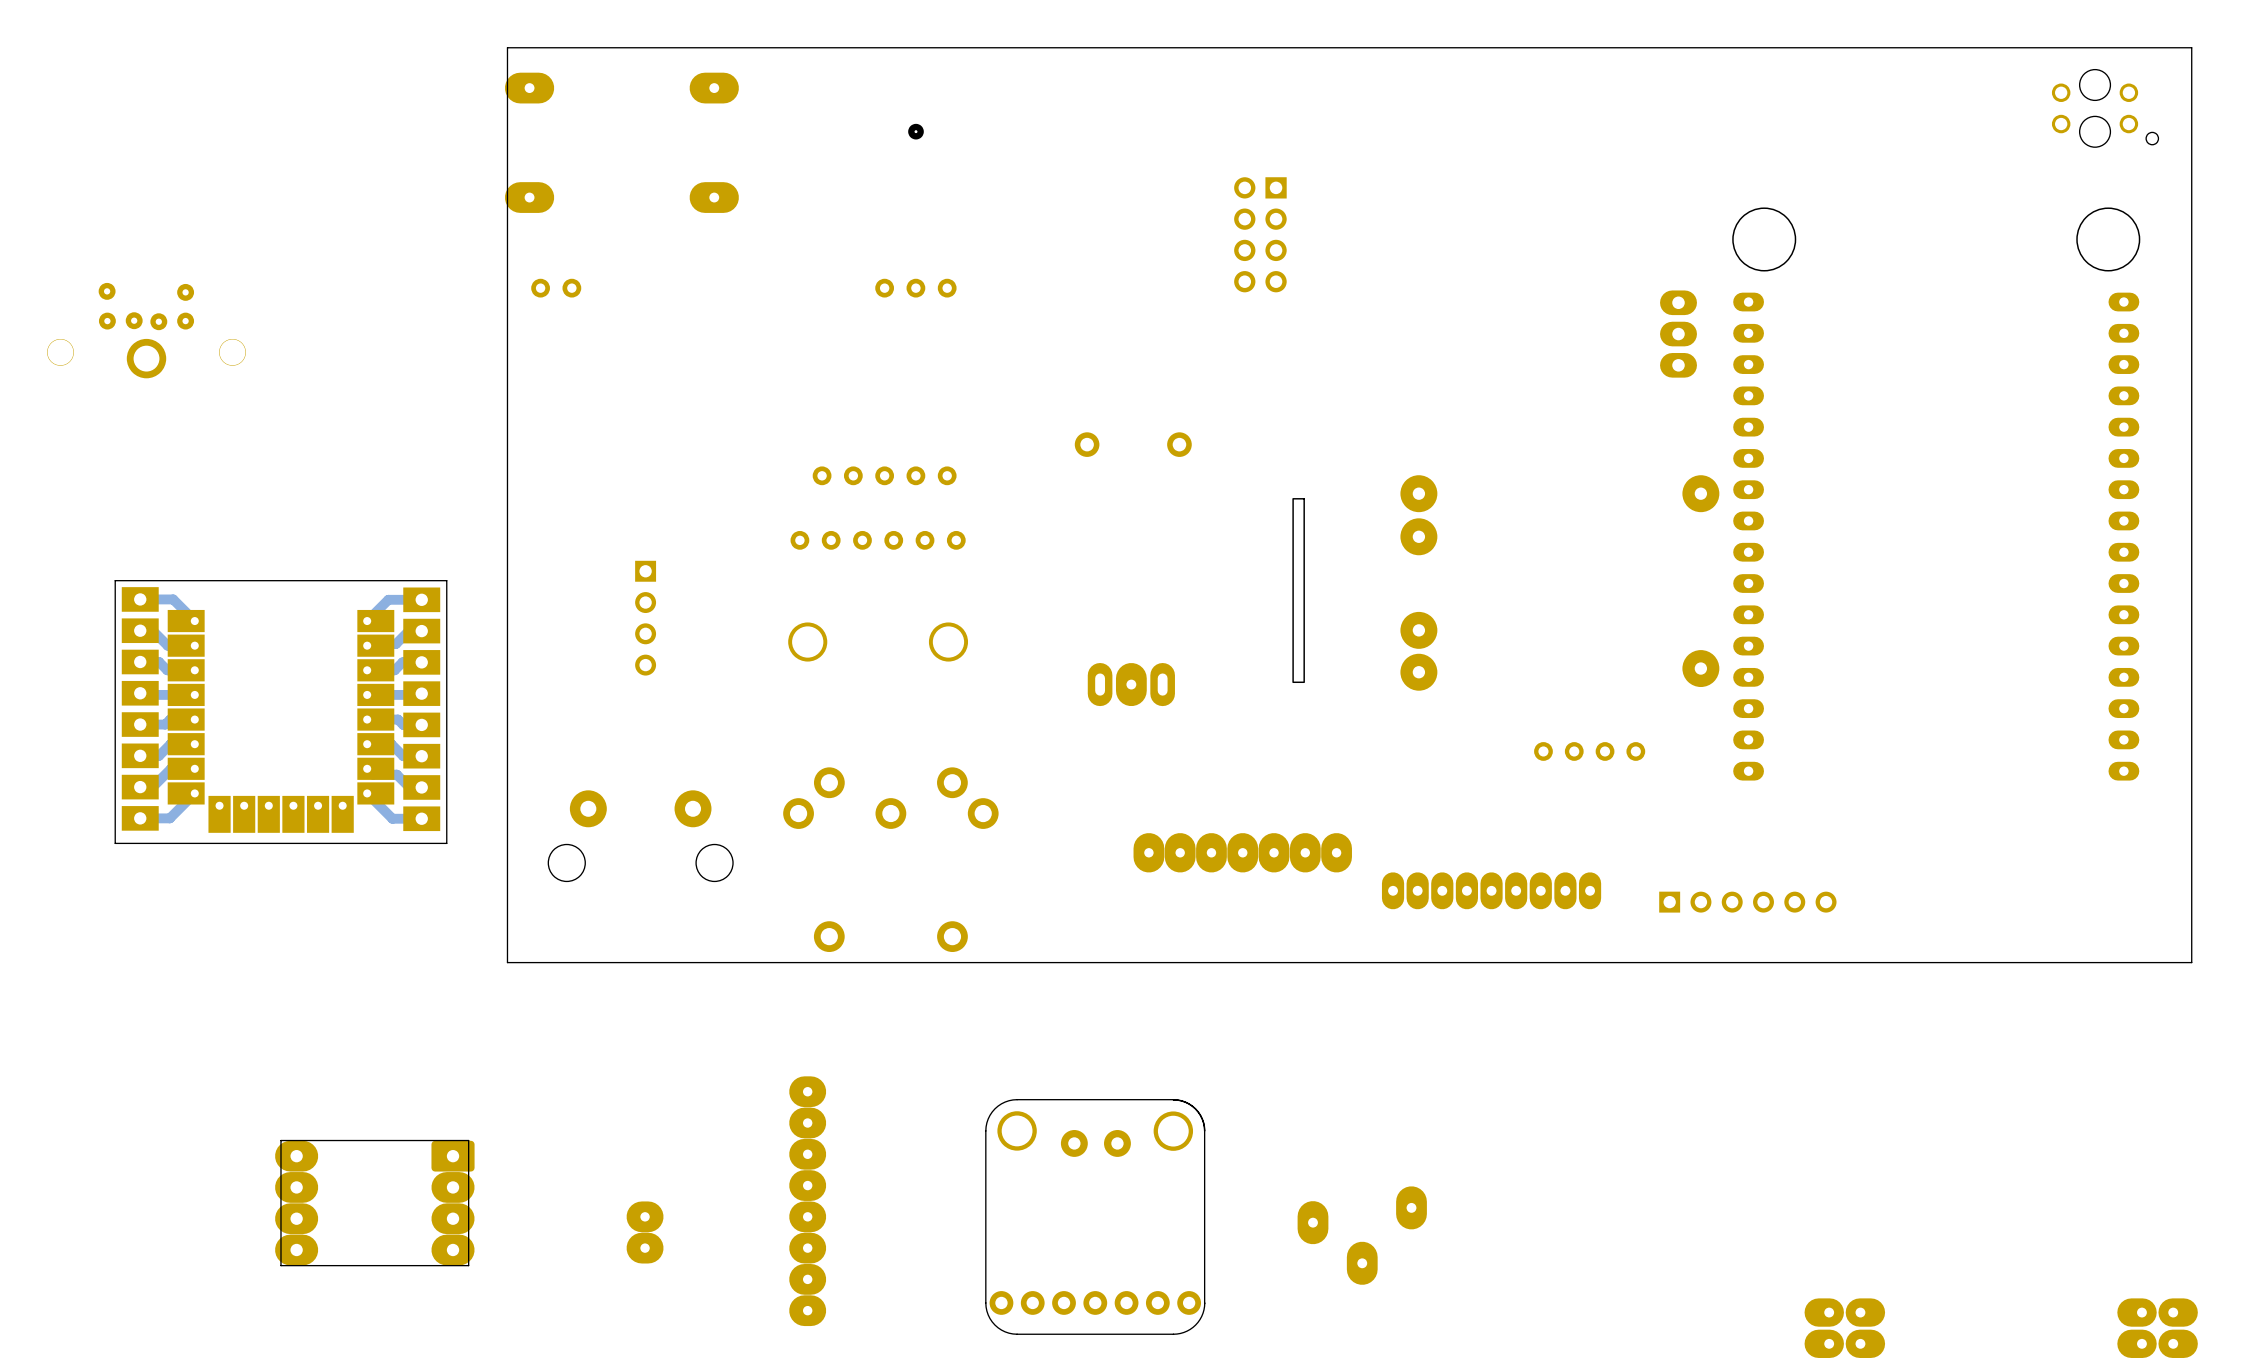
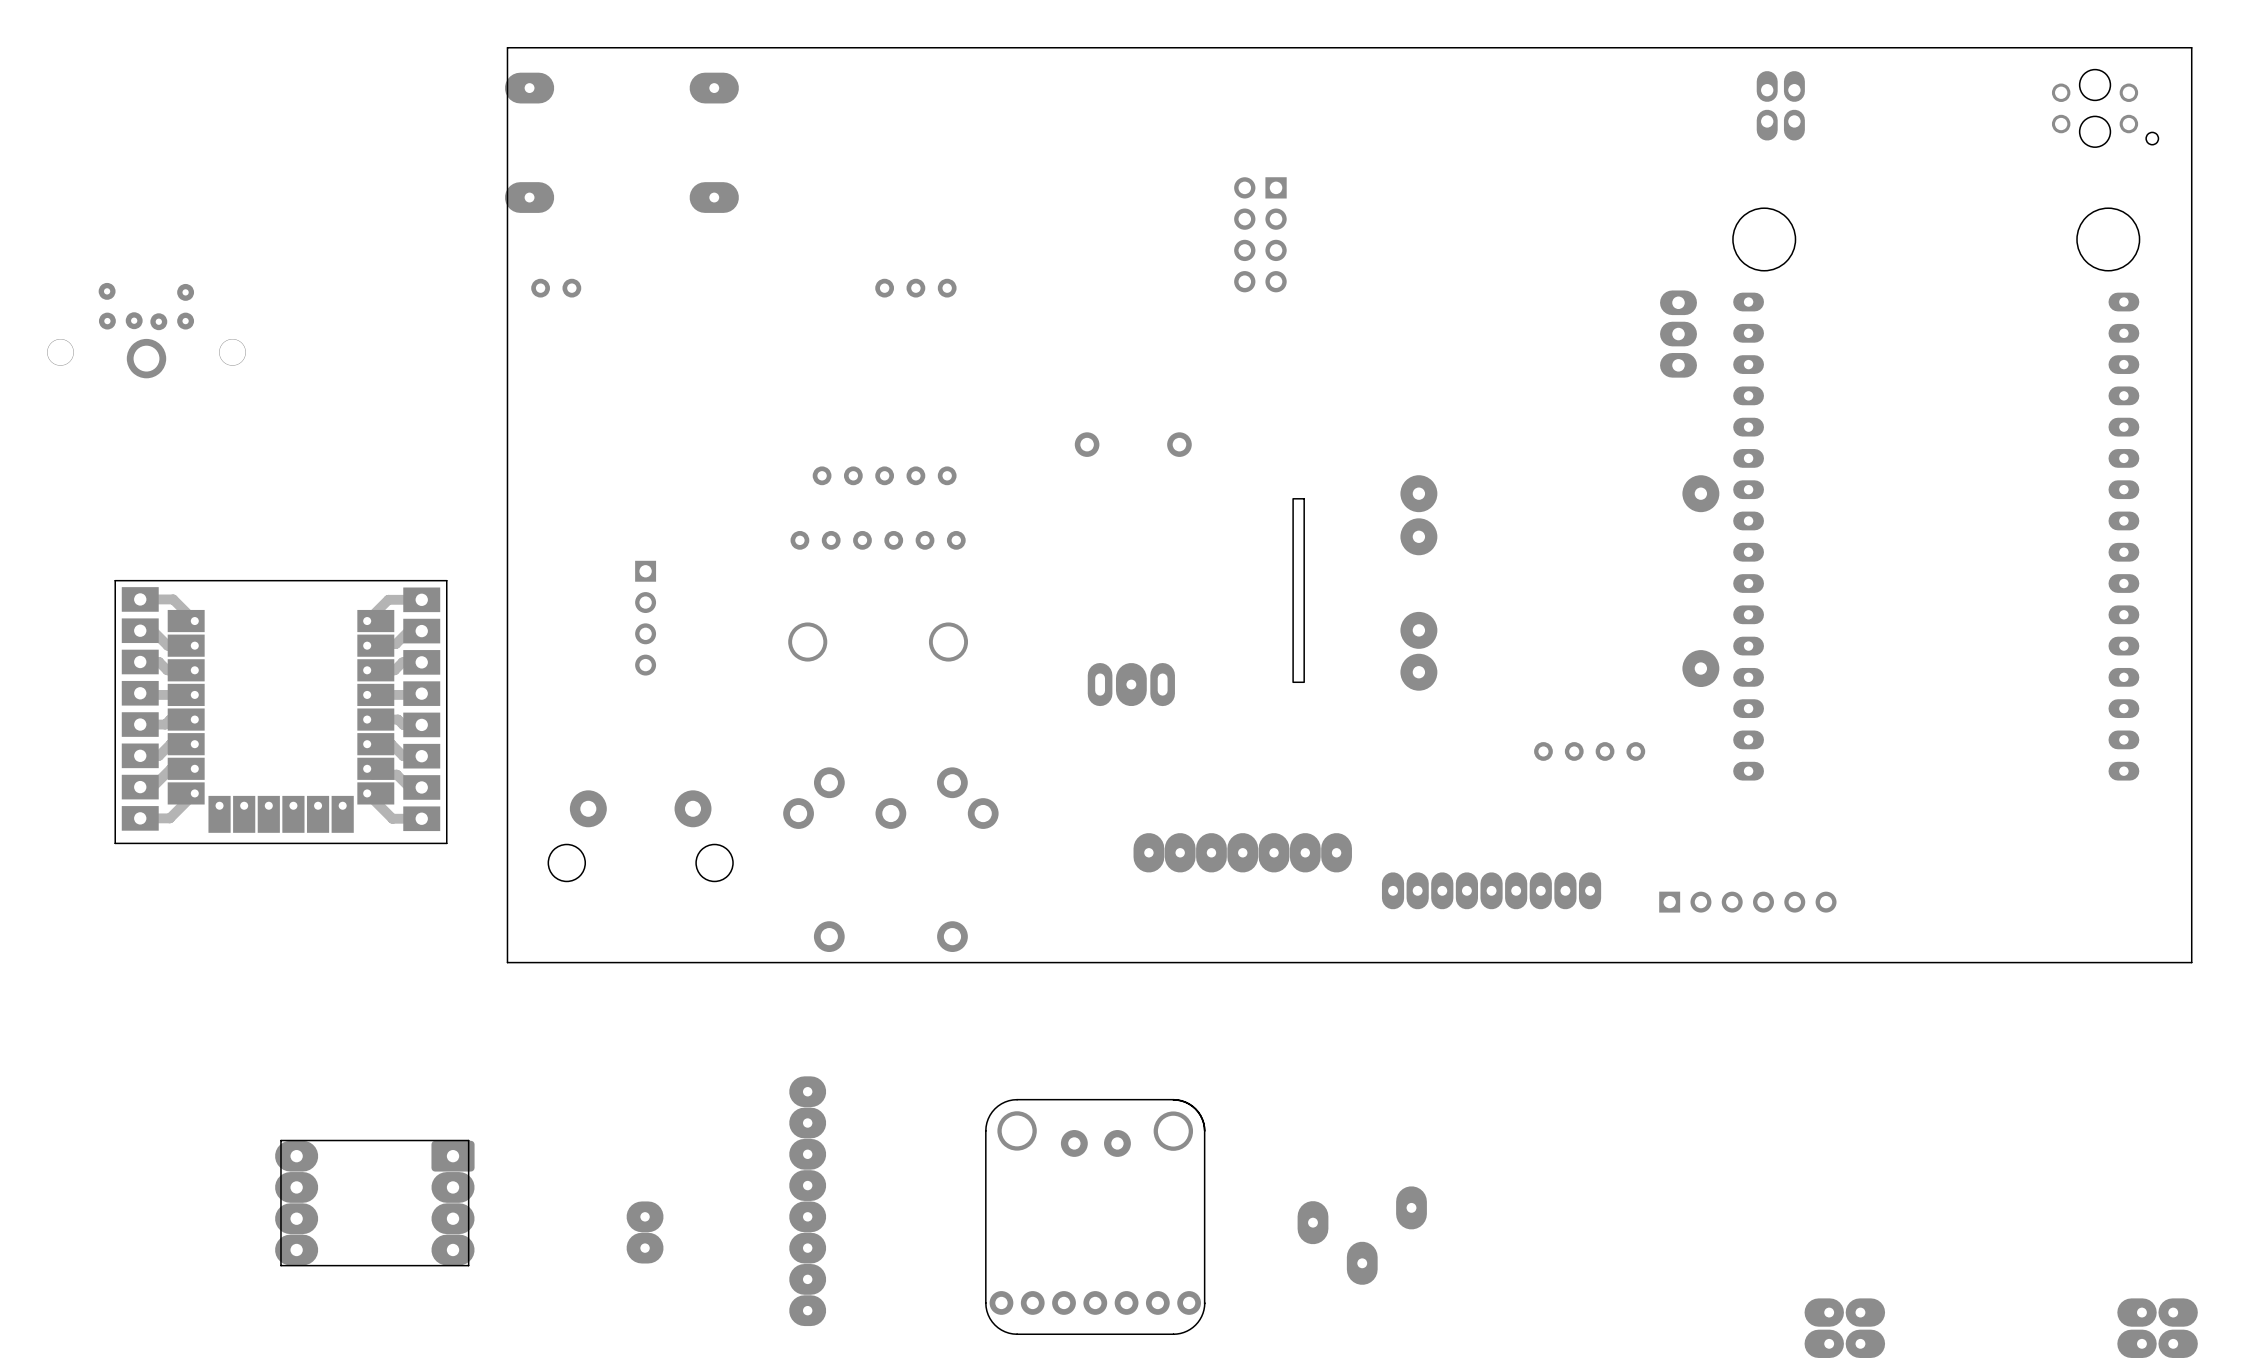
part: none -> (1780, 105)
part: (915, 131) -> none

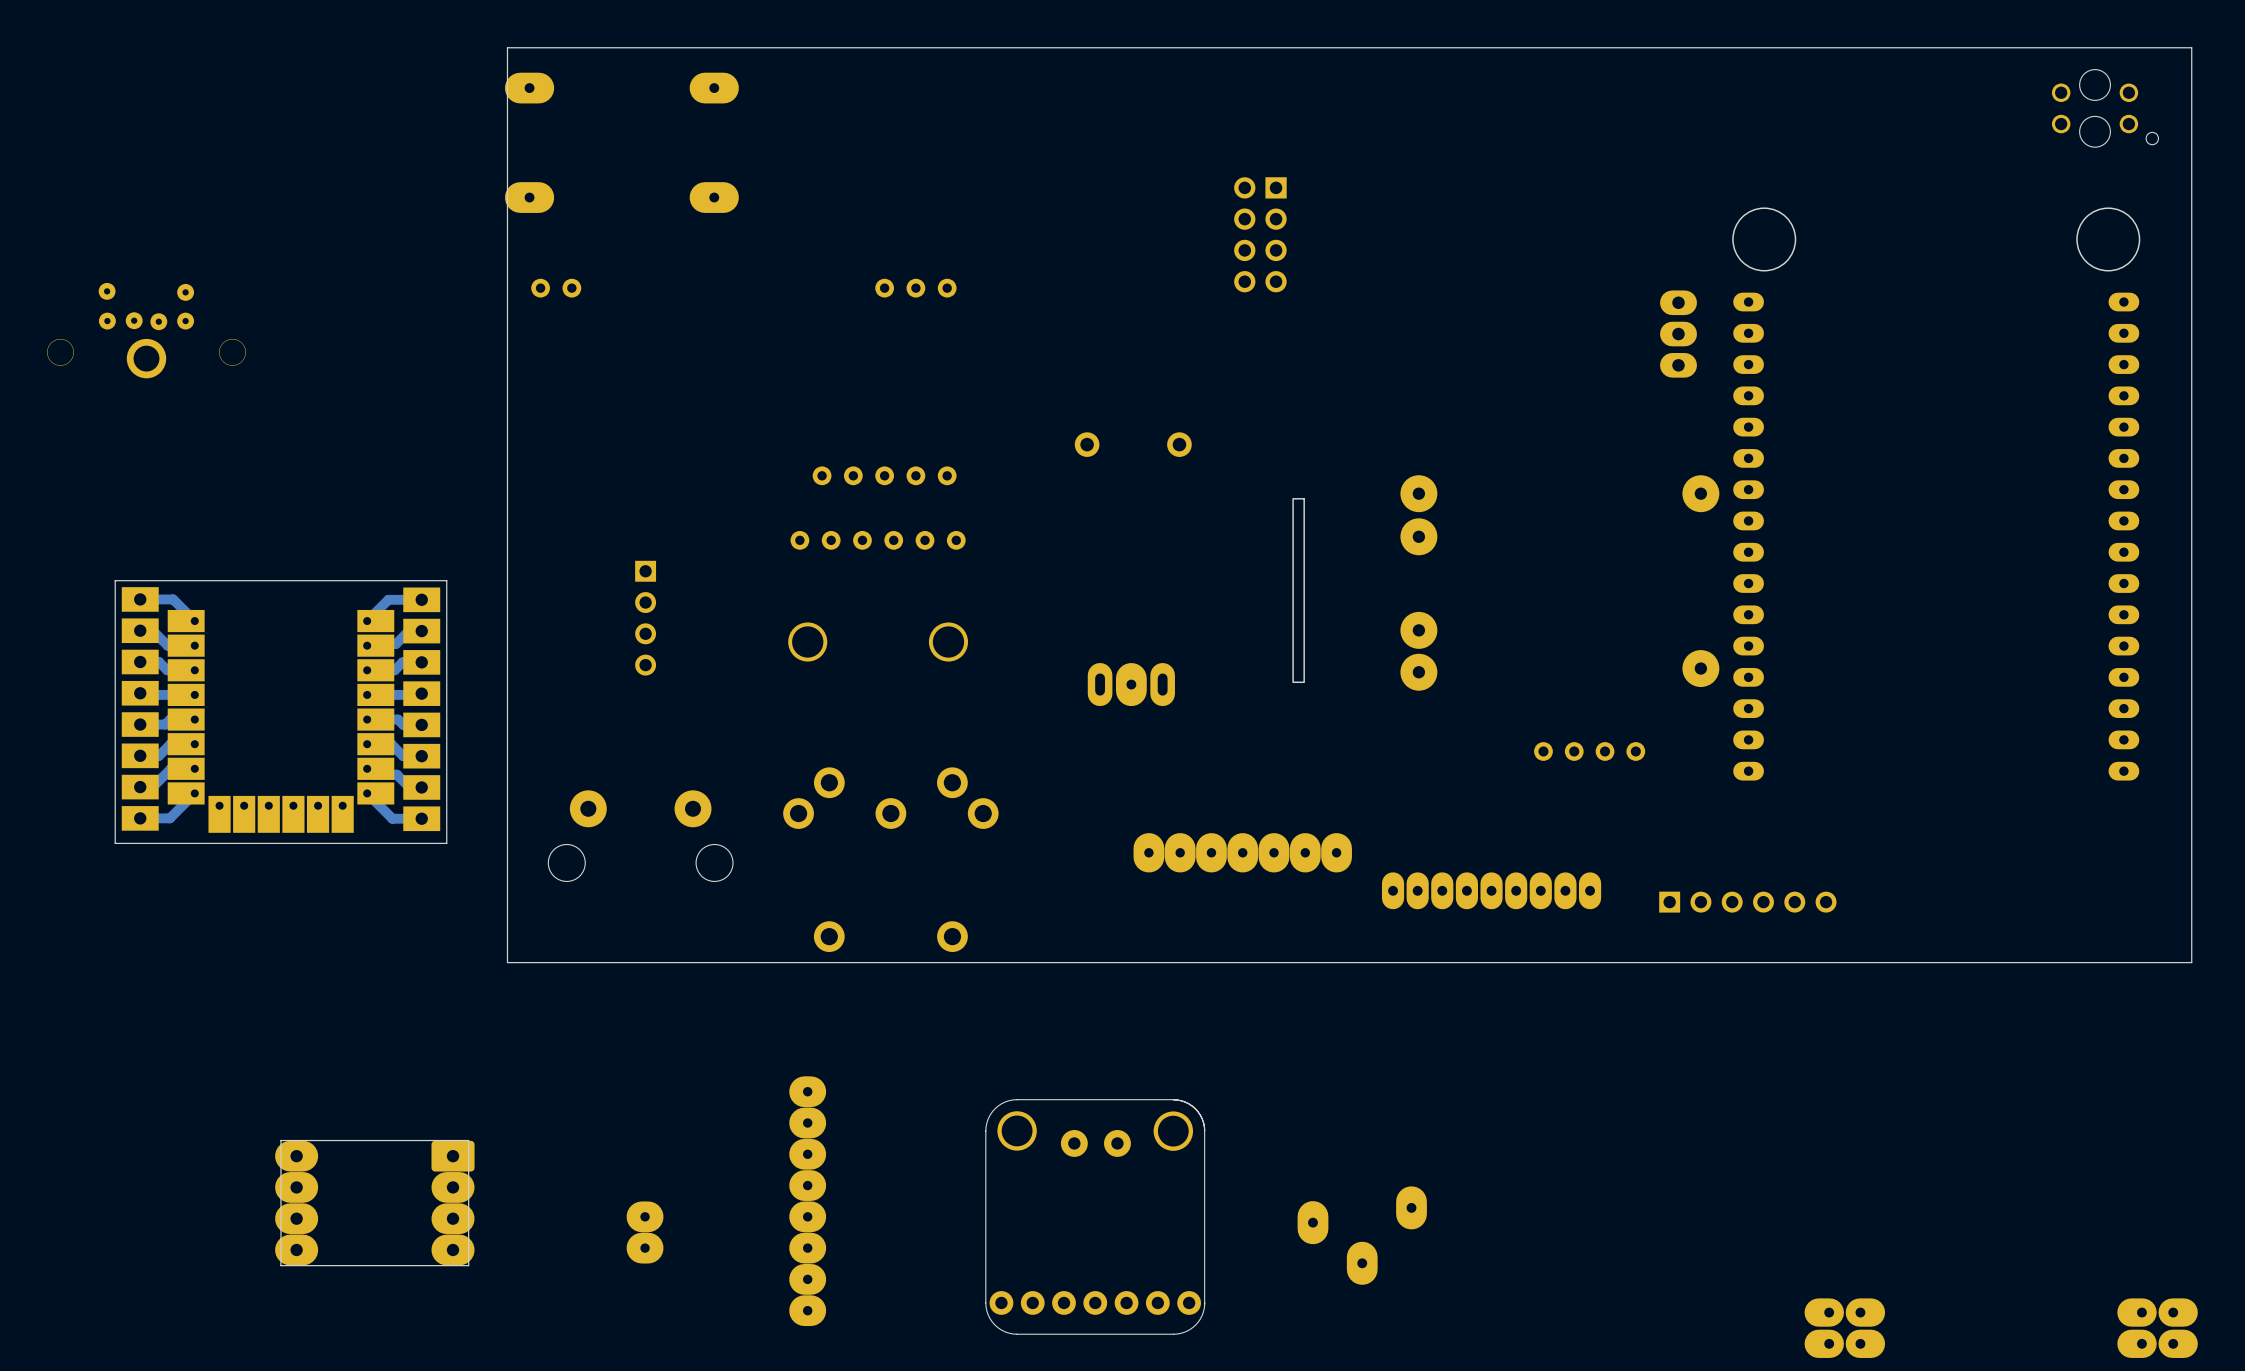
part: (1780, 105) -> none

